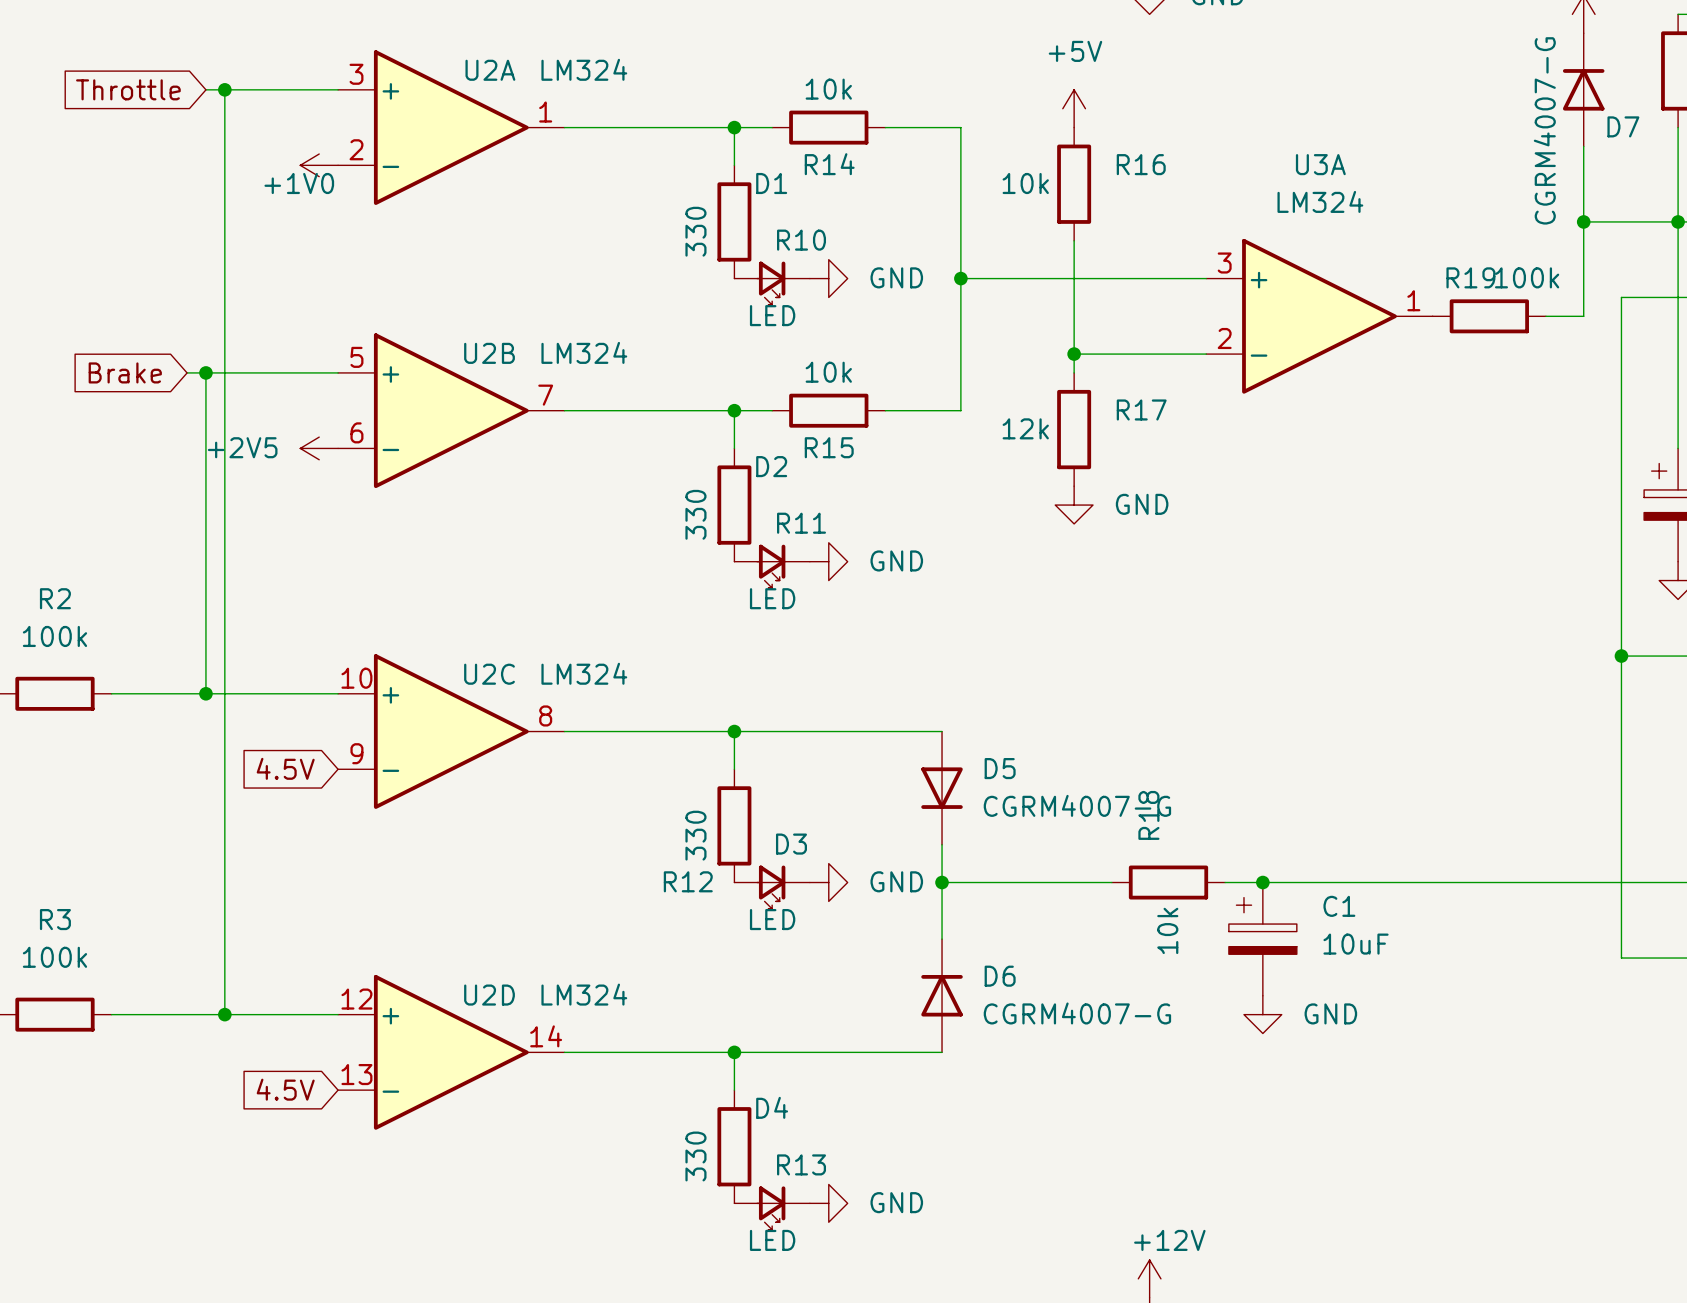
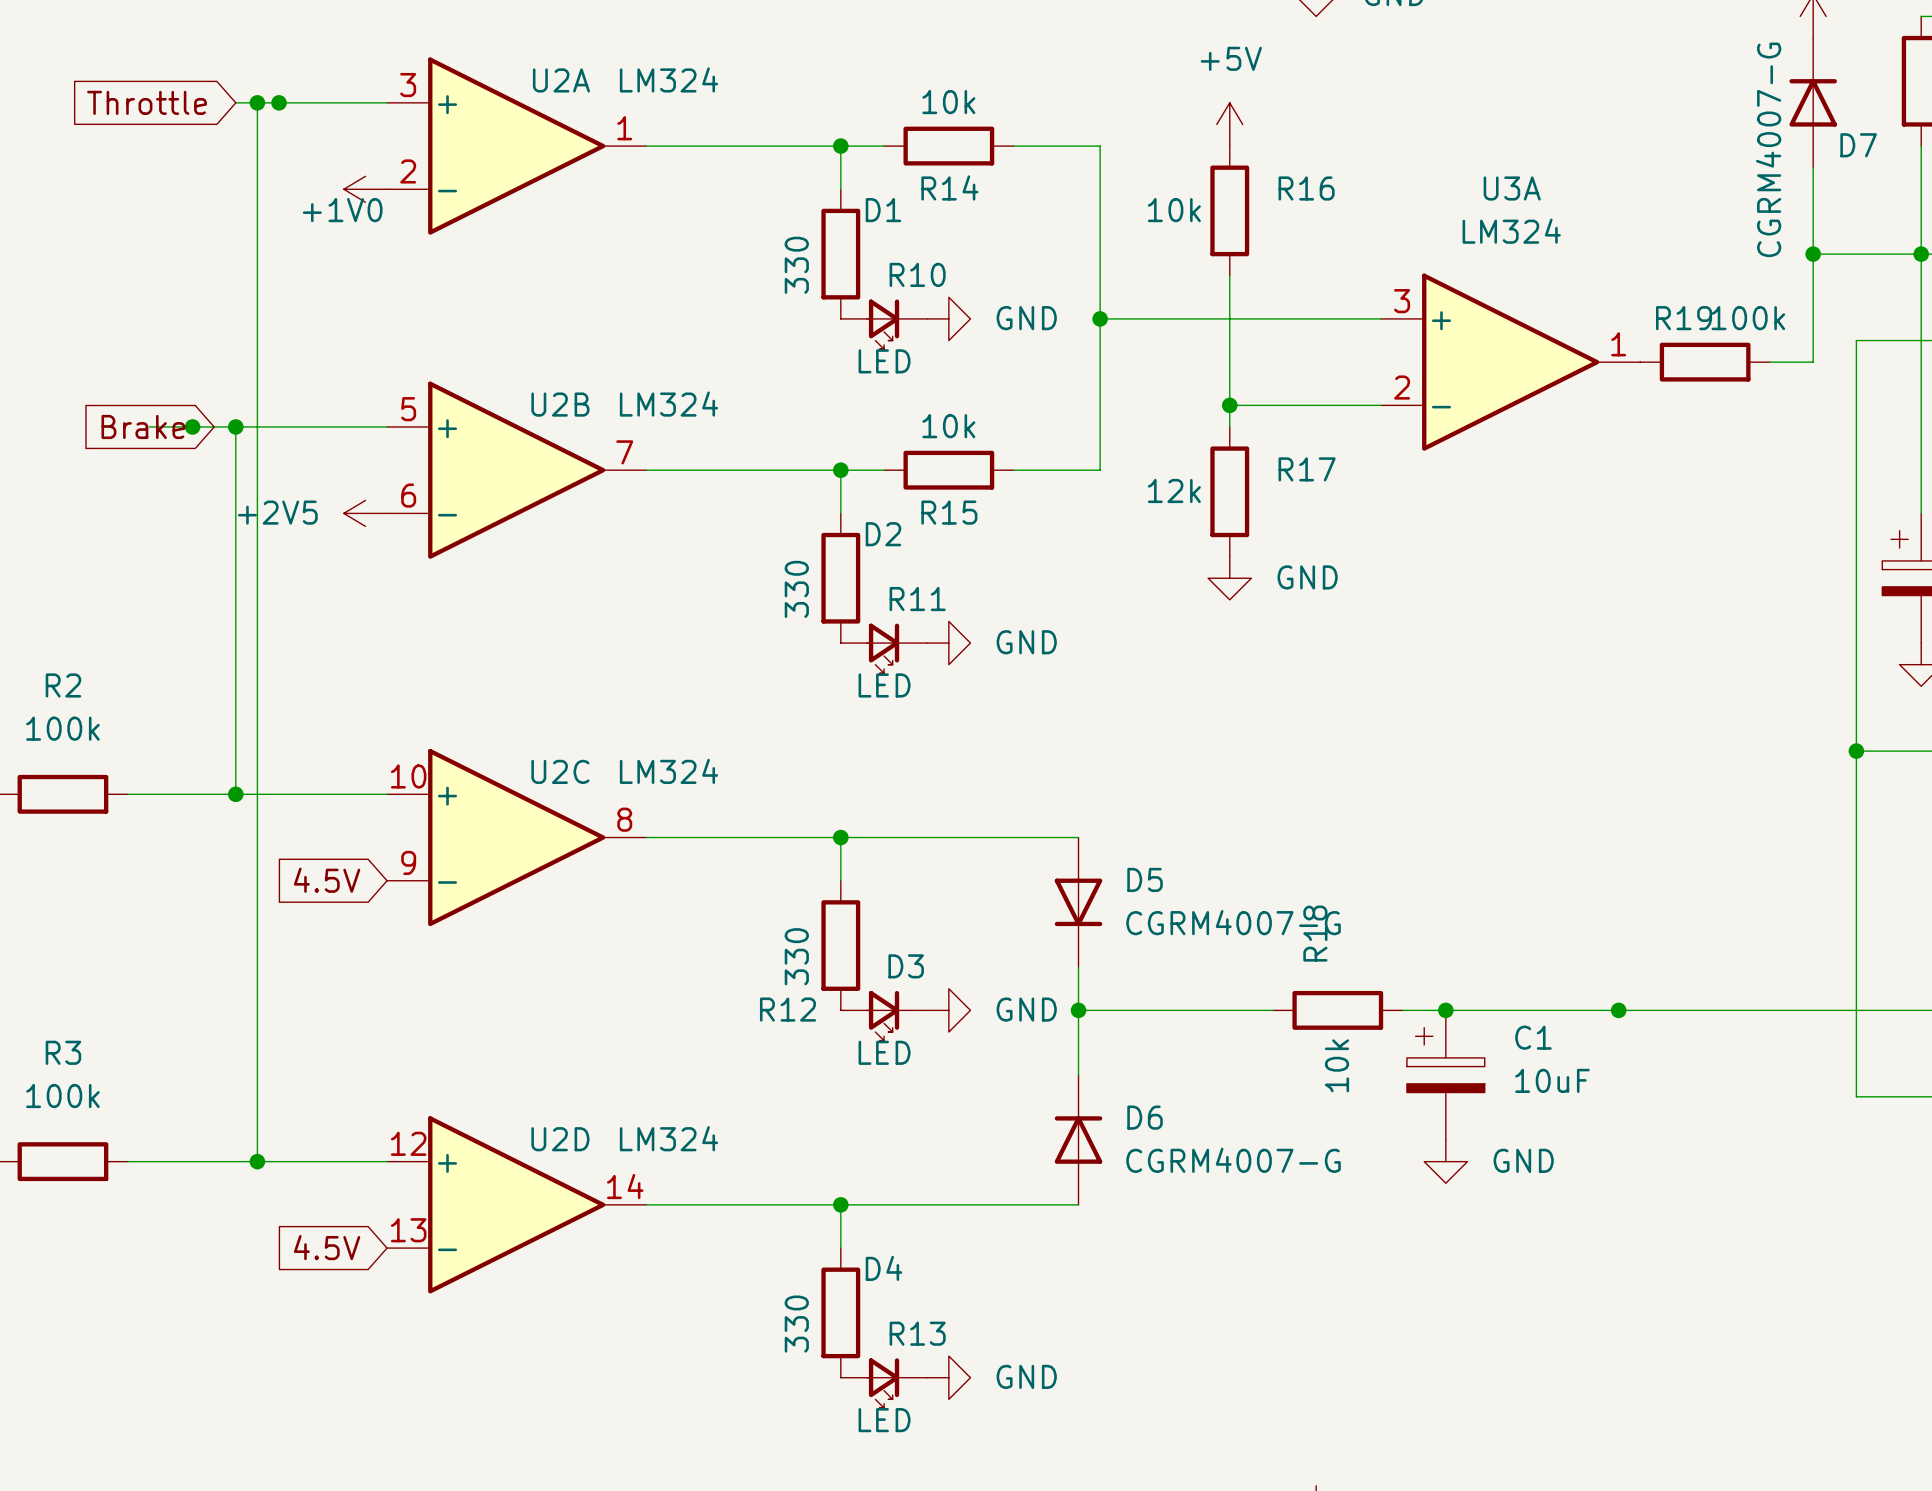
junction: none -> (279, 102)
wire: none -> (149, 426) (214, 426)
junction: none -> (192, 426)
junction: none -> (1618, 1010)
power symbol: +12V (1149, 1278) -> none

